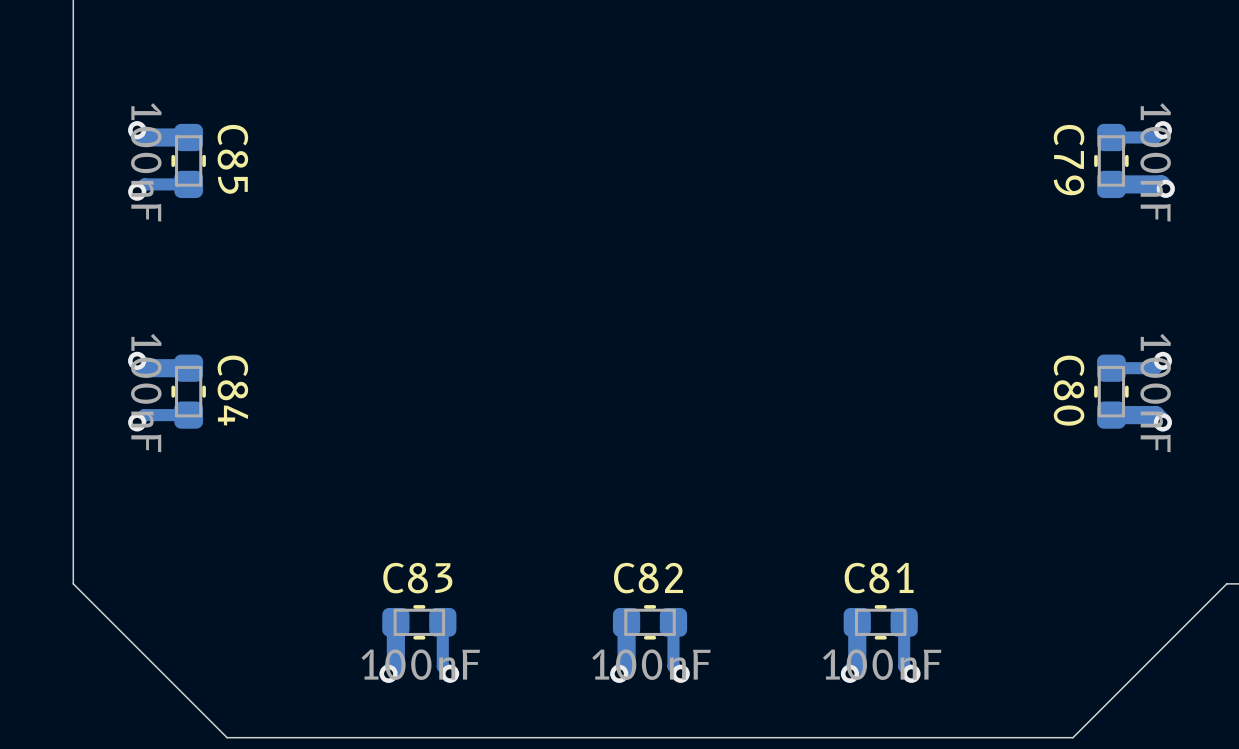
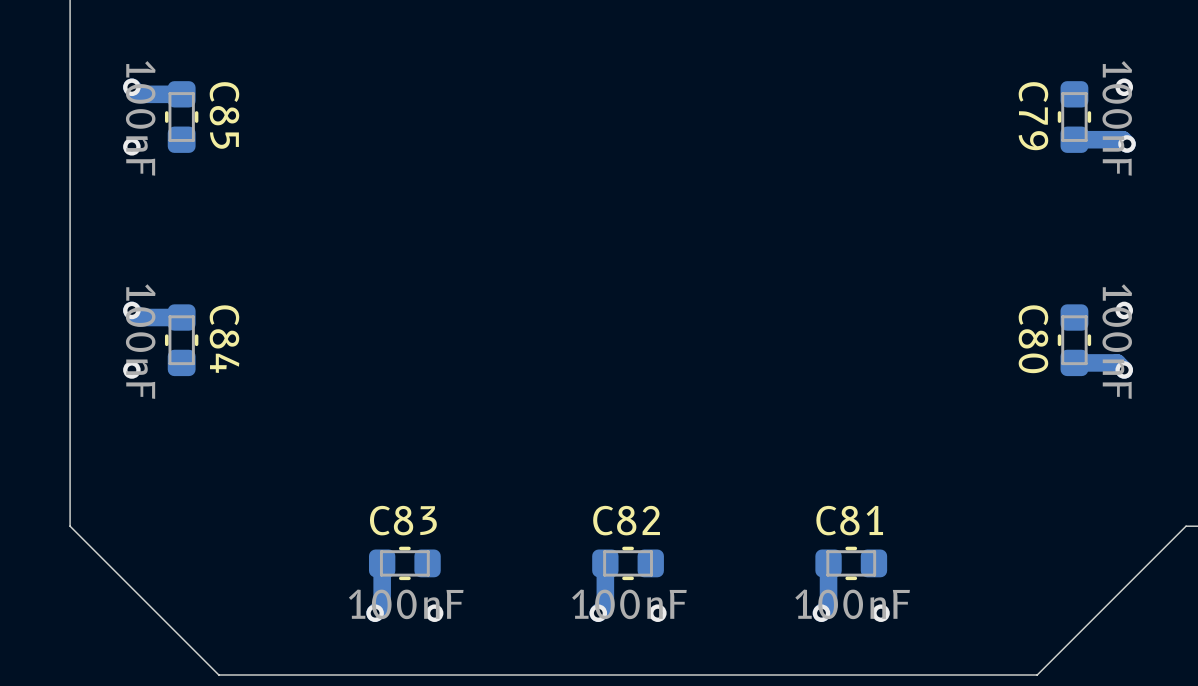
track: (1162, 130) (1155, 137) (1111, 137) -> none
track: (188, 184) (144, 184) (137, 191) -> none
track: (1162, 360) (1155, 368) (1111, 368) -> none
track: (188, 415) (144, 415) (137, 422) -> none
track: (442, 622) (442, 666) (450, 673) -> none
track: (673, 622) (673, 666) (680, 673) -> none
track: (904, 622) (904, 666) (911, 673) -> none

